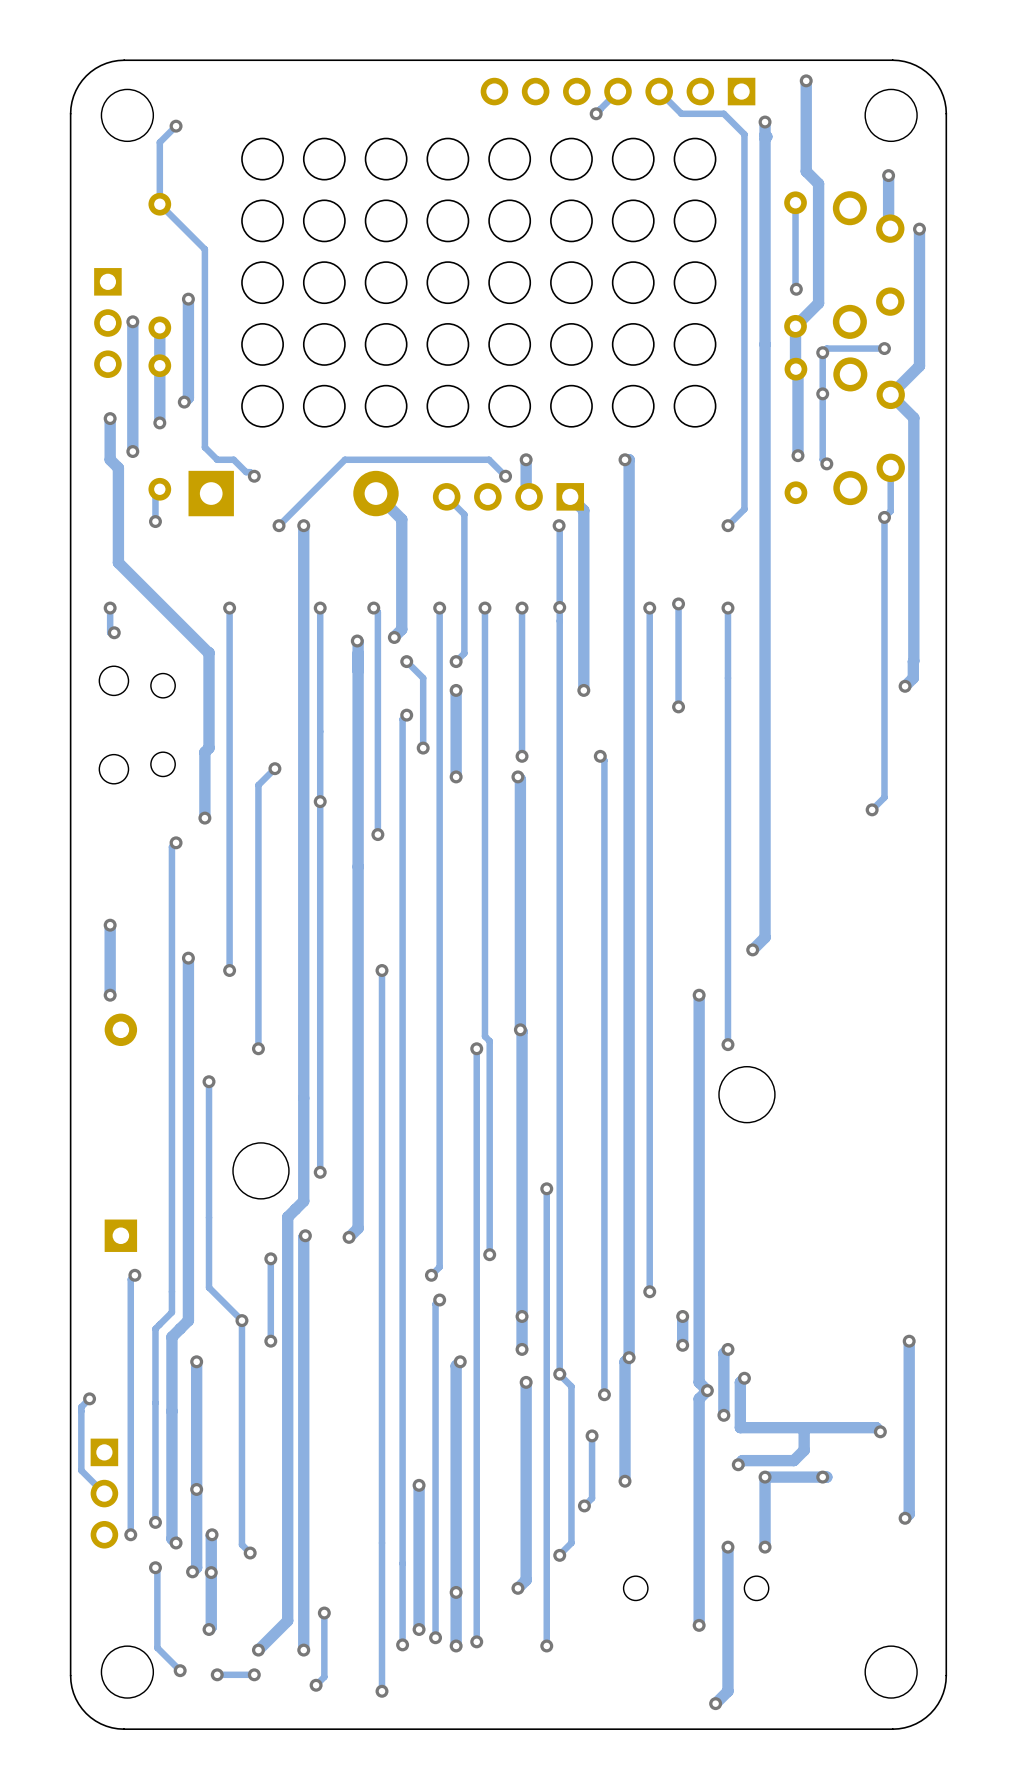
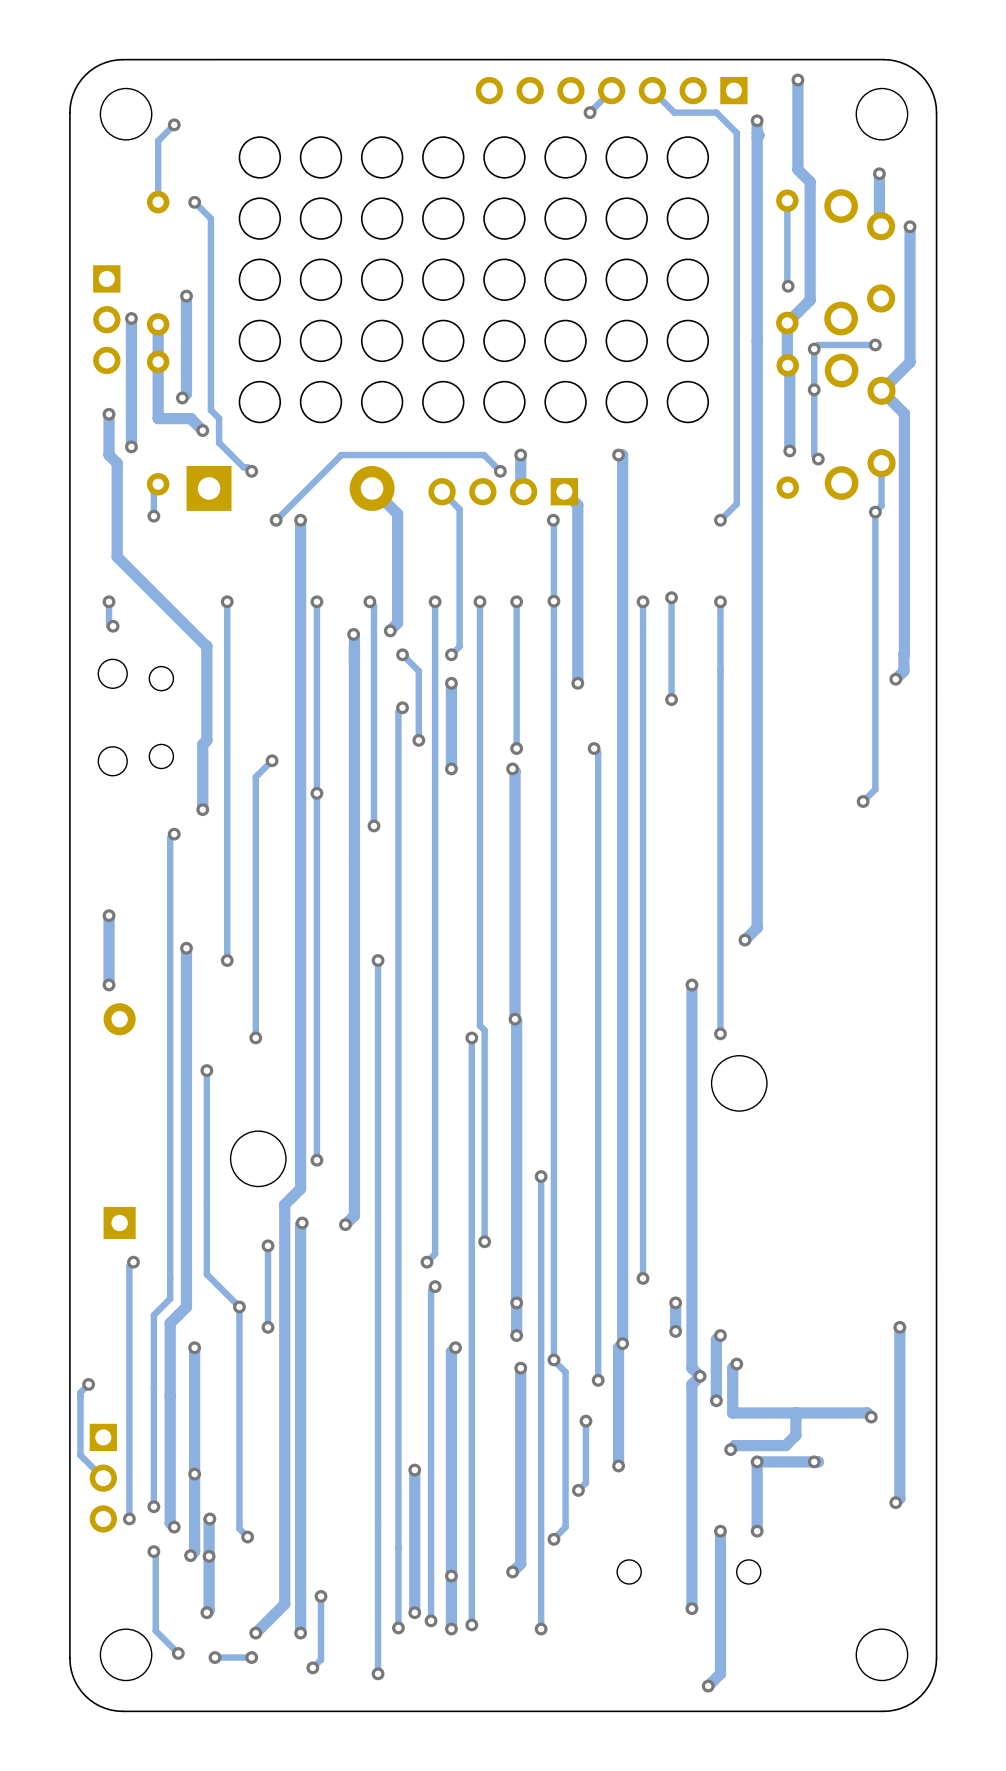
track: (159, 204) (204, 249) (204, 447) (217, 459) (233, 459) -> (194, 202) (210, 218) (210, 410) (219, 418) (219, 442) (231, 455)
via: none -> (194, 202)
track: none -> (158, 418) (190, 418) (202, 430)
via position: (159, 422) -> (202, 430)

